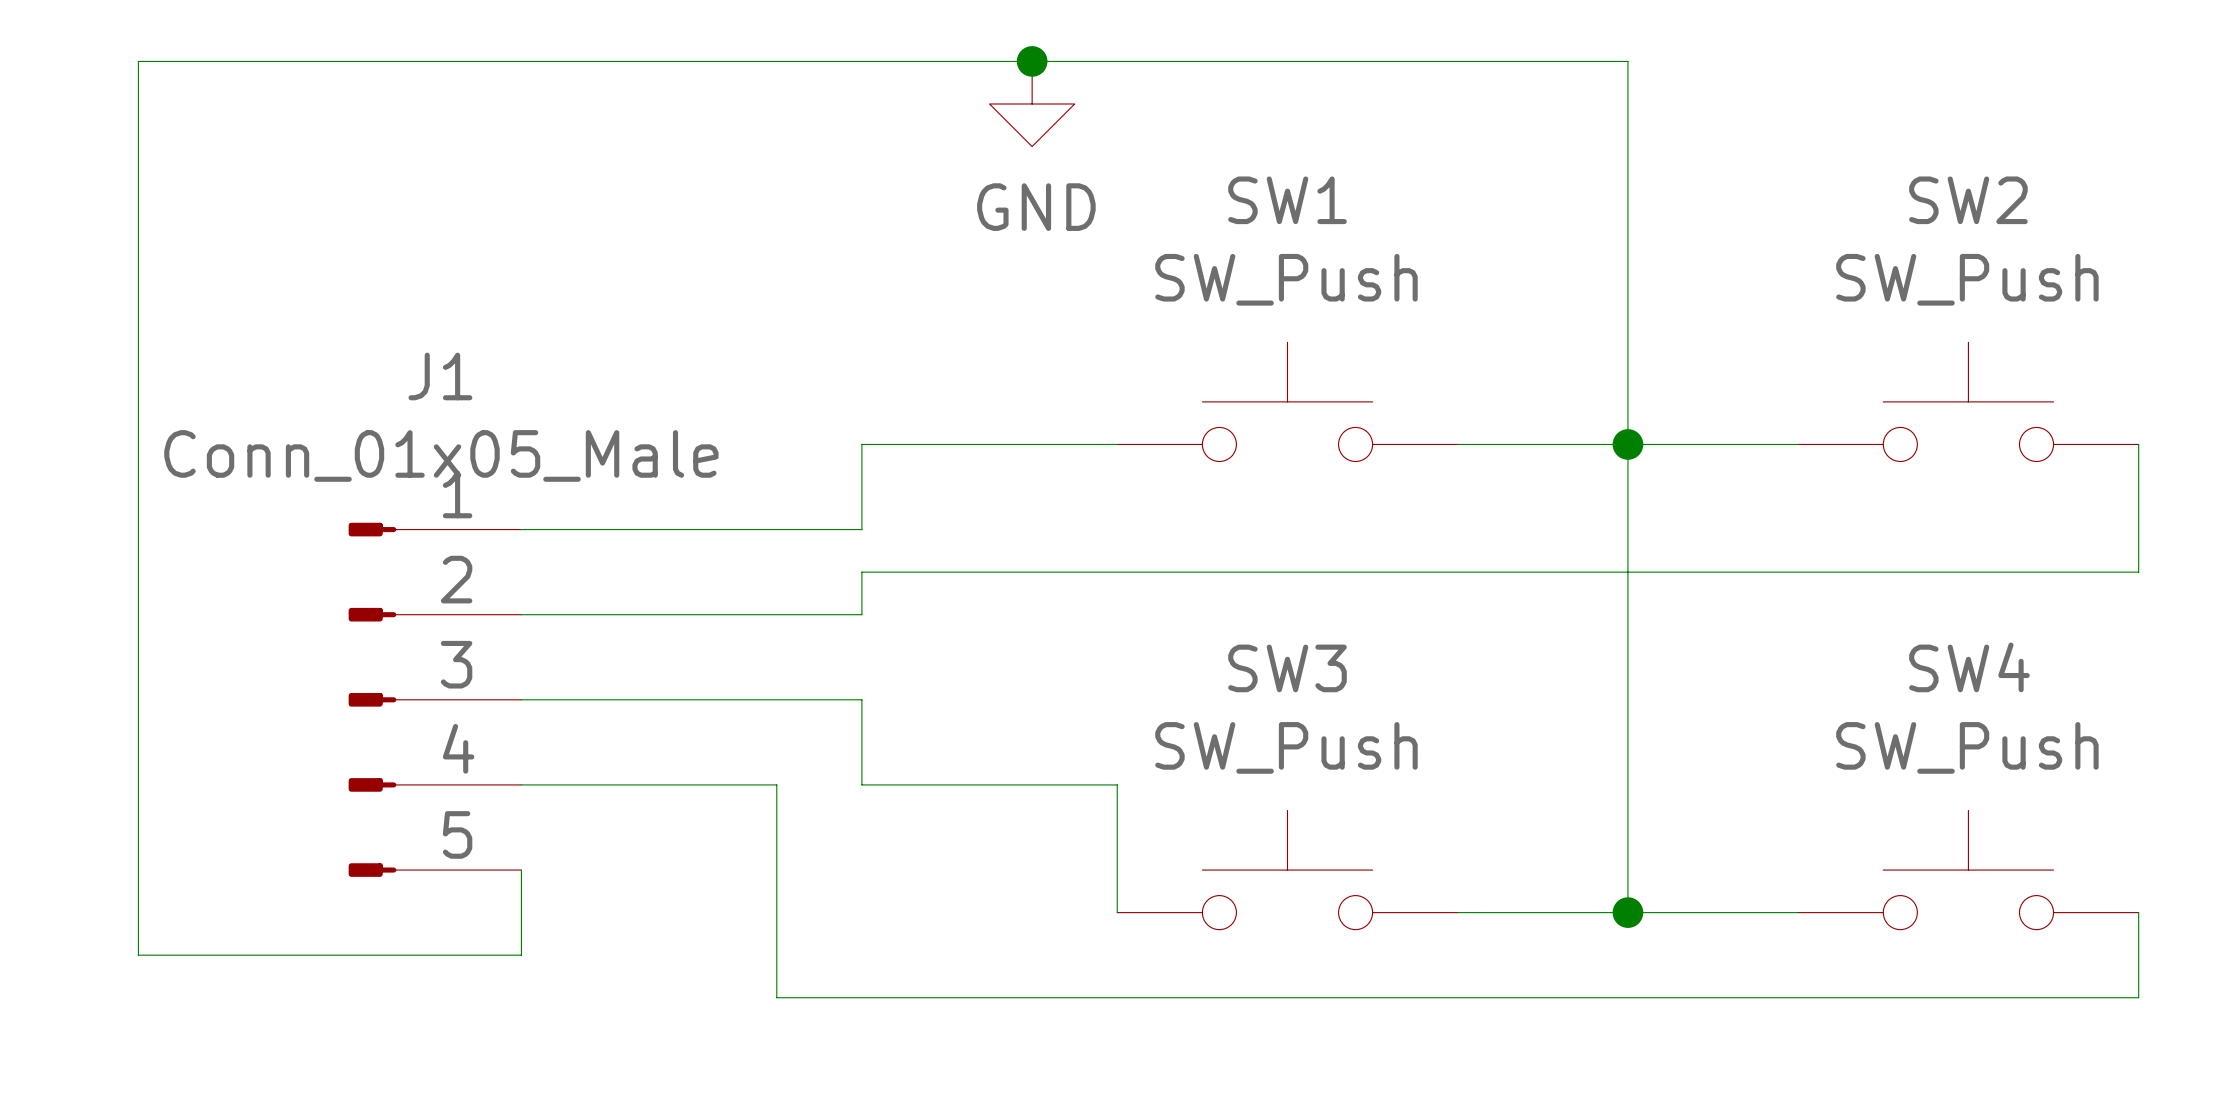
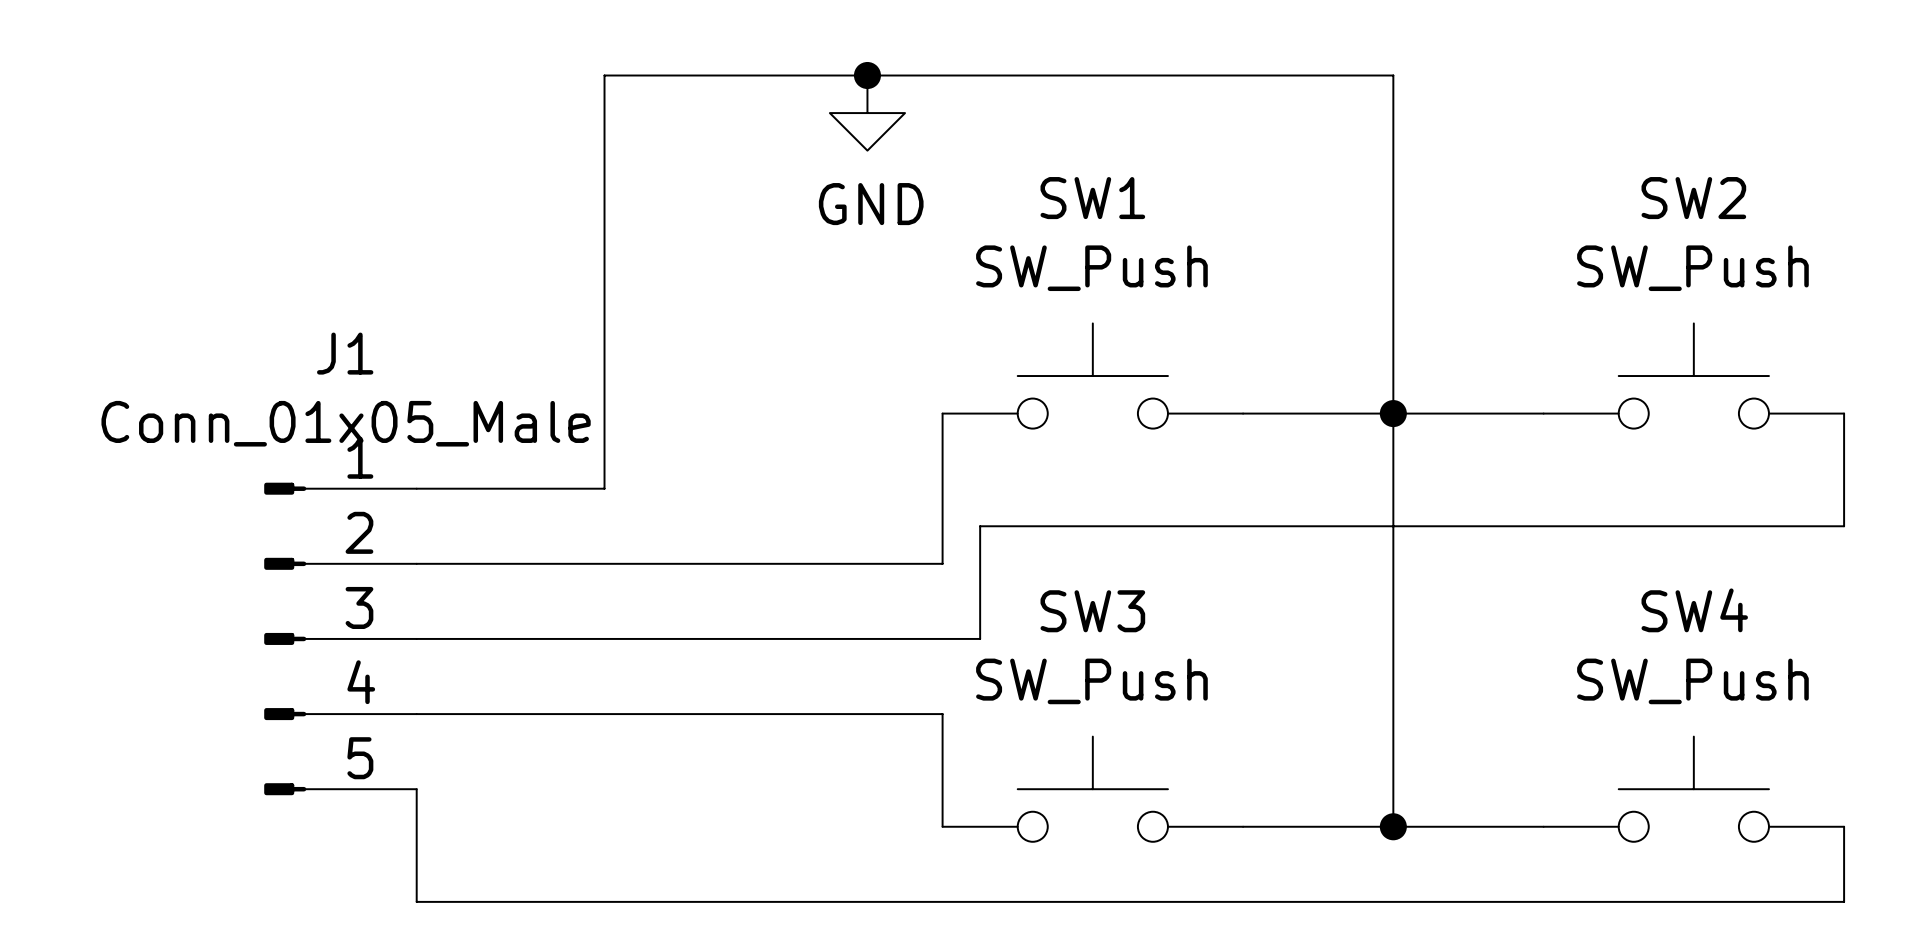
wire: (734, 61) (138, 61) (138, 955) (521, 955) -> (604, 75) (604, 488)
wire: (1117, 444) (861, 444) (861, 529) (734, 529) -> (942, 413) (942, 563) (717, 563)
wire: (1159, 572) (861, 572) (861, 614) -> (980, 526) (980, 638) (717, 638)
wire: (861, 699) (861, 784) -> (642, 714) (717, 714)
wire: (776, 784) (776, 997) -> (416, 864) (416, 901) (642, 901)

